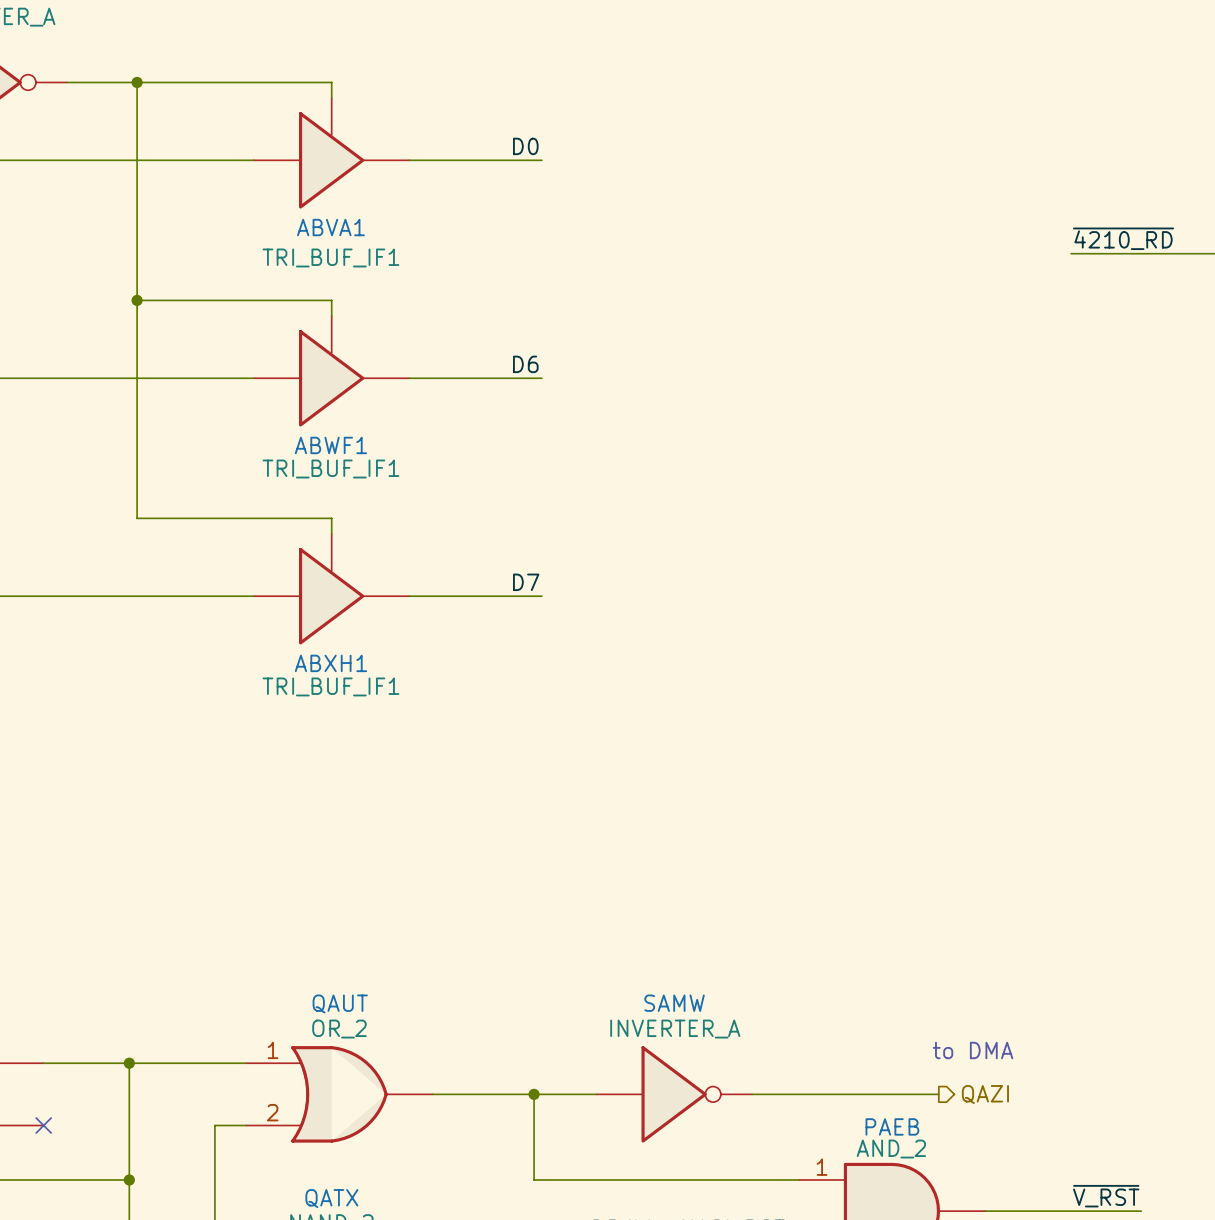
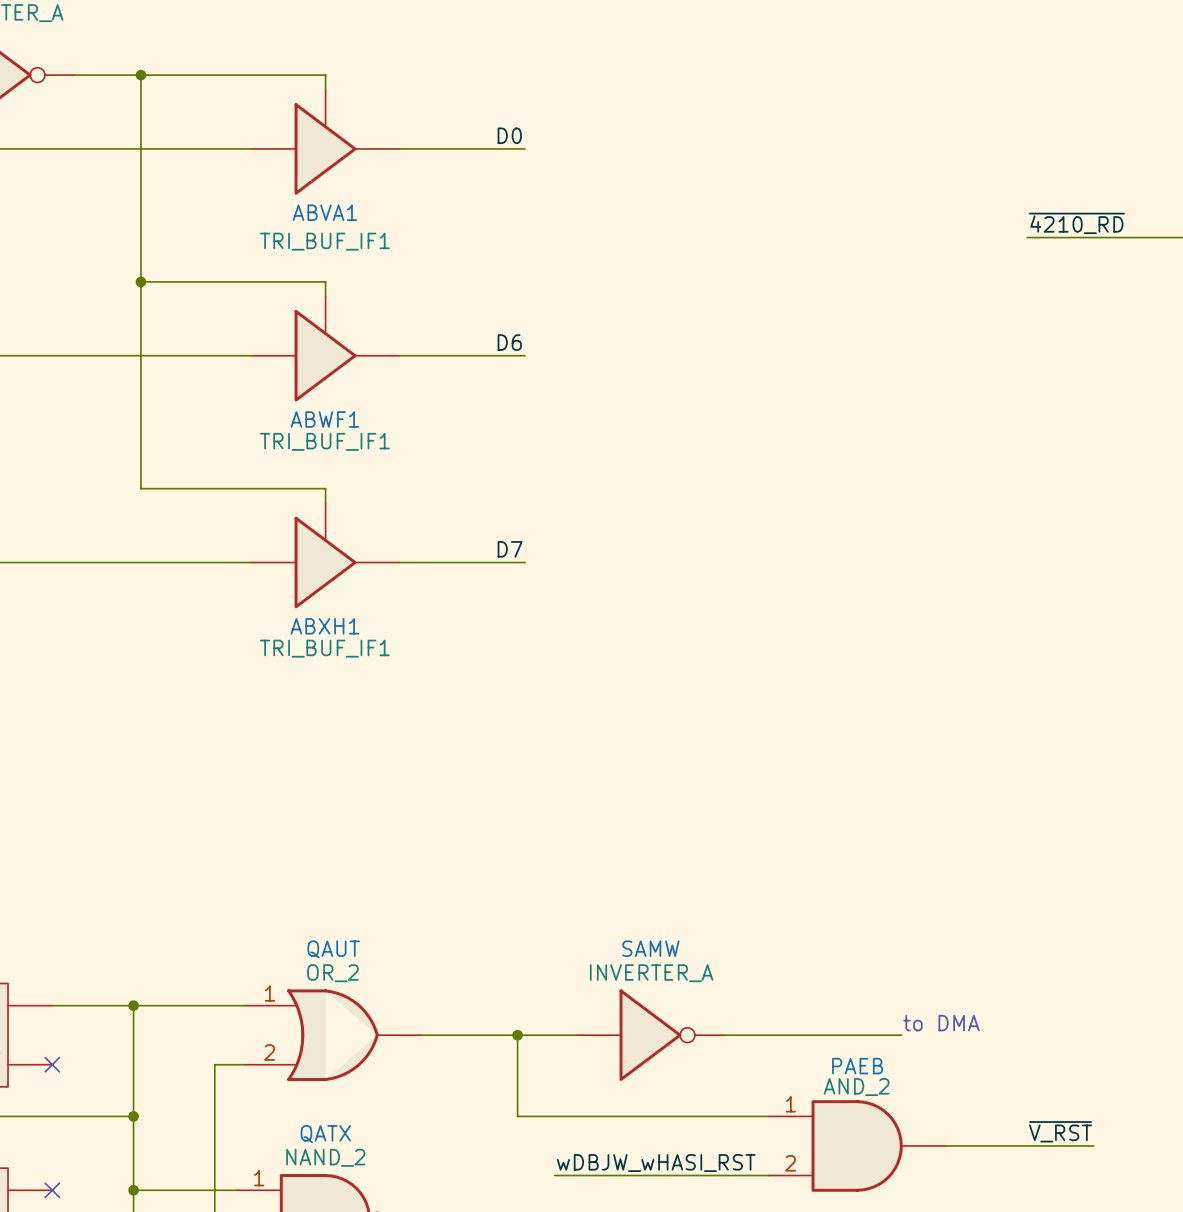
text position: to DMA (973, 1050) -> to DMA (941, 1023)
hierarchical label: QAZI (985, 1094) -> none

